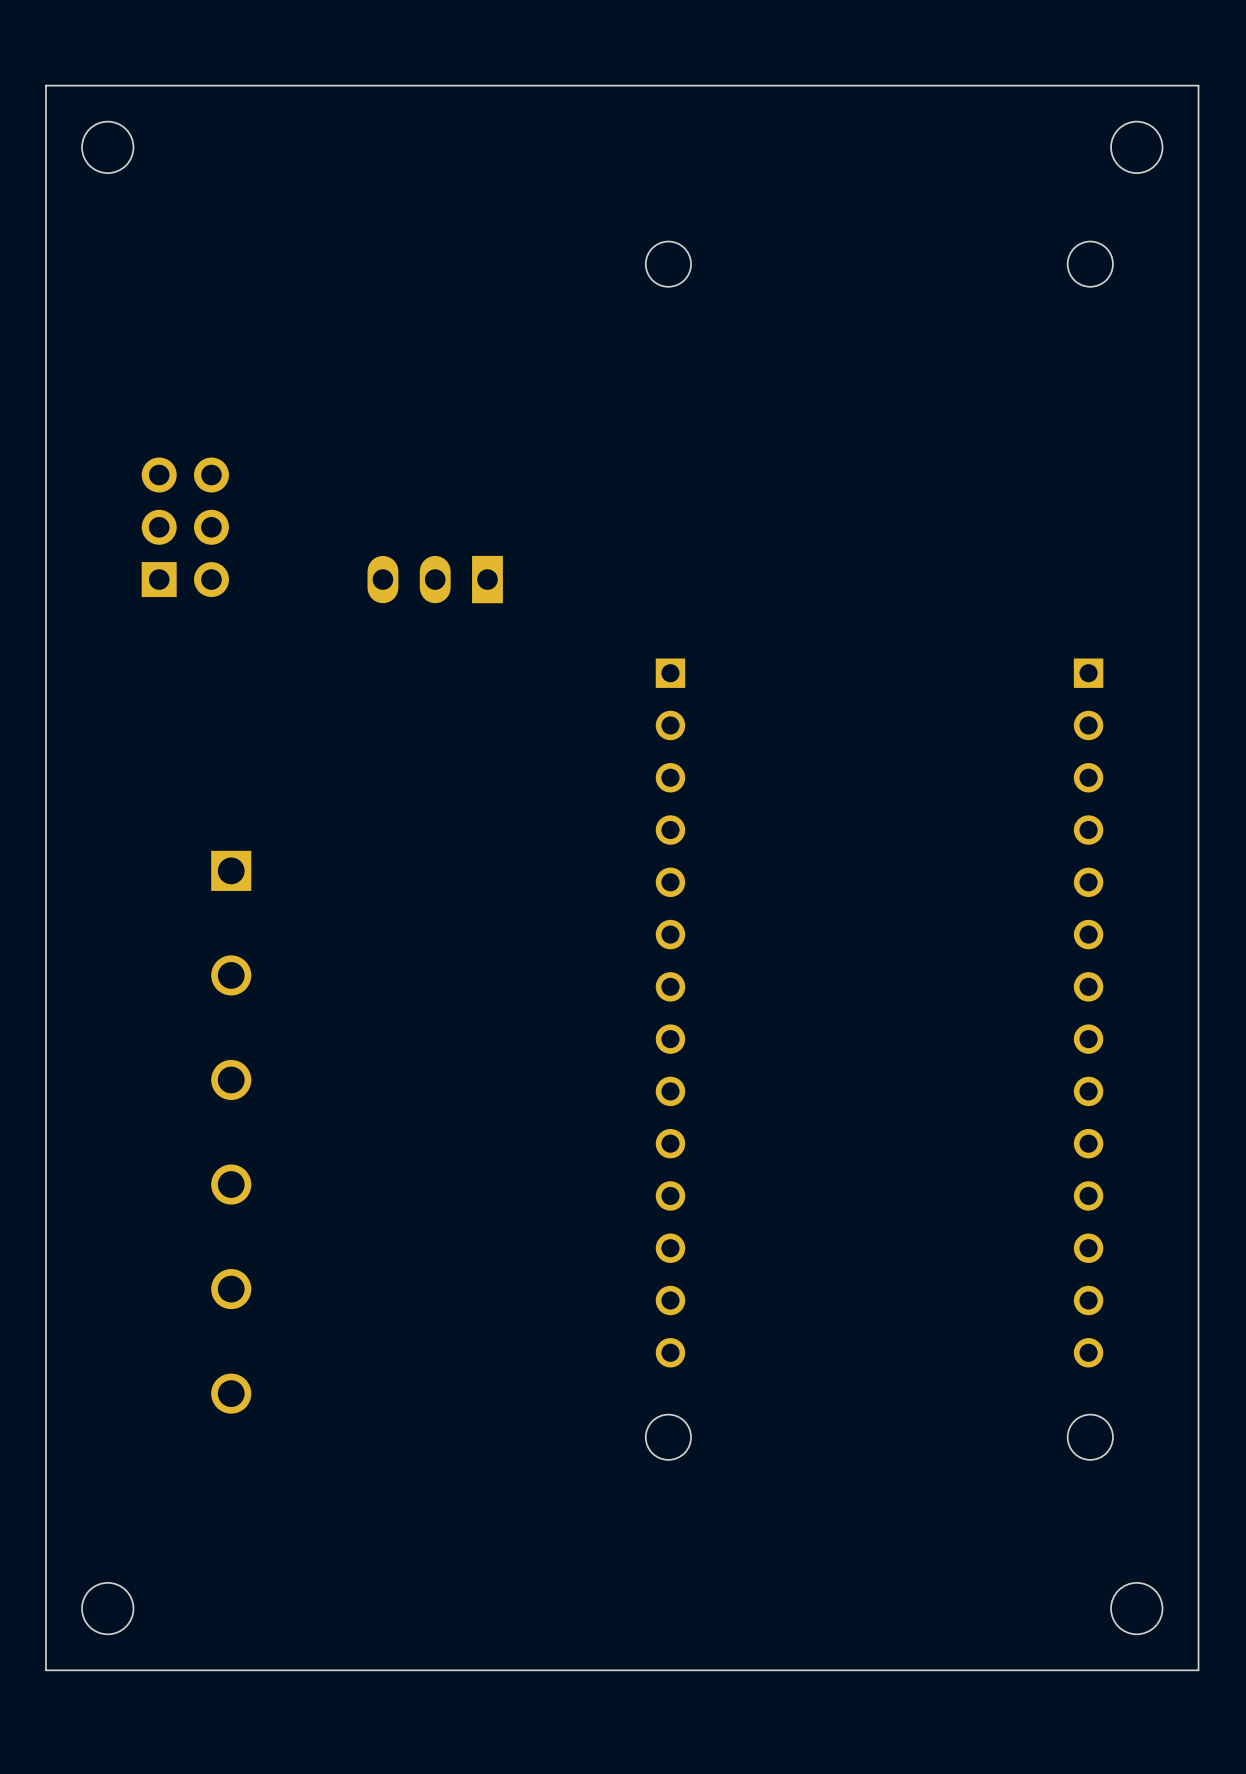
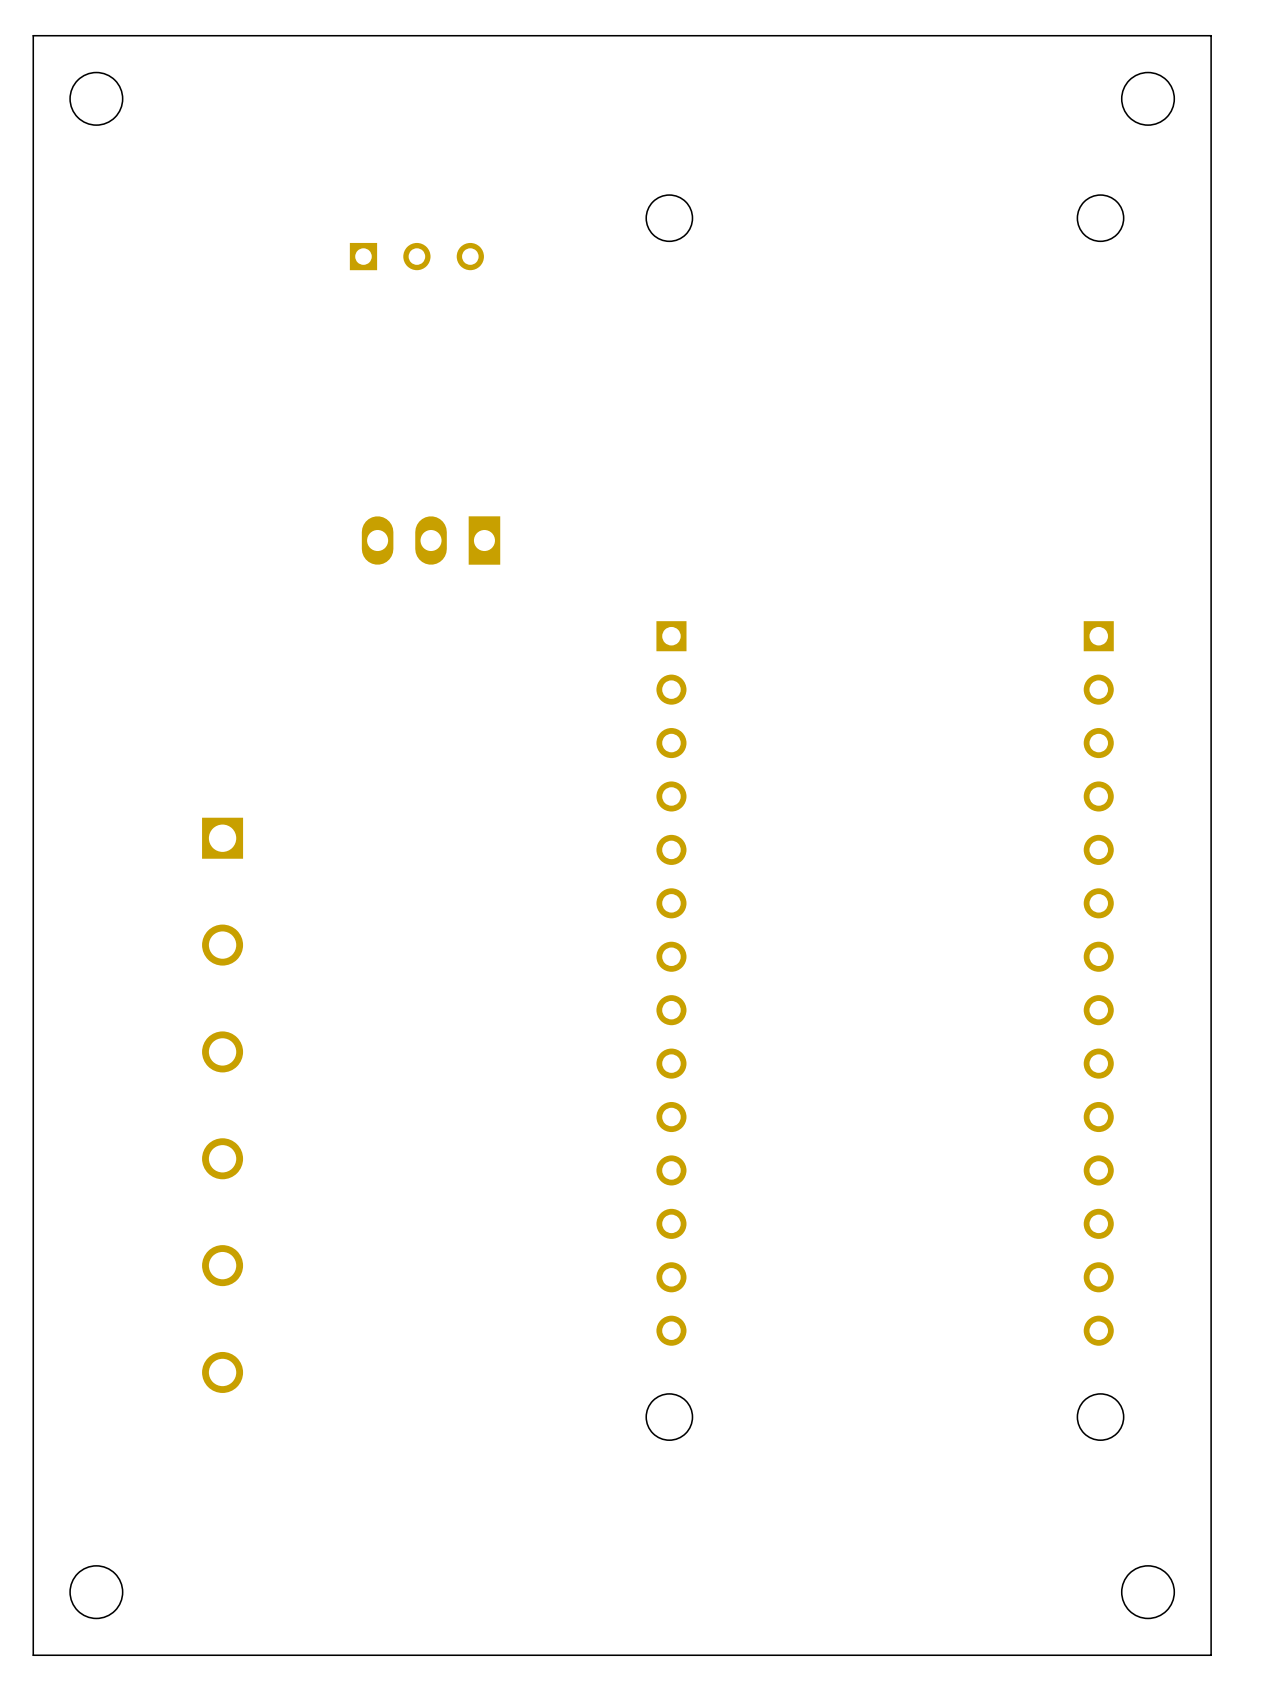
part: none -> (416, 256)
part: (185, 527) -> none

